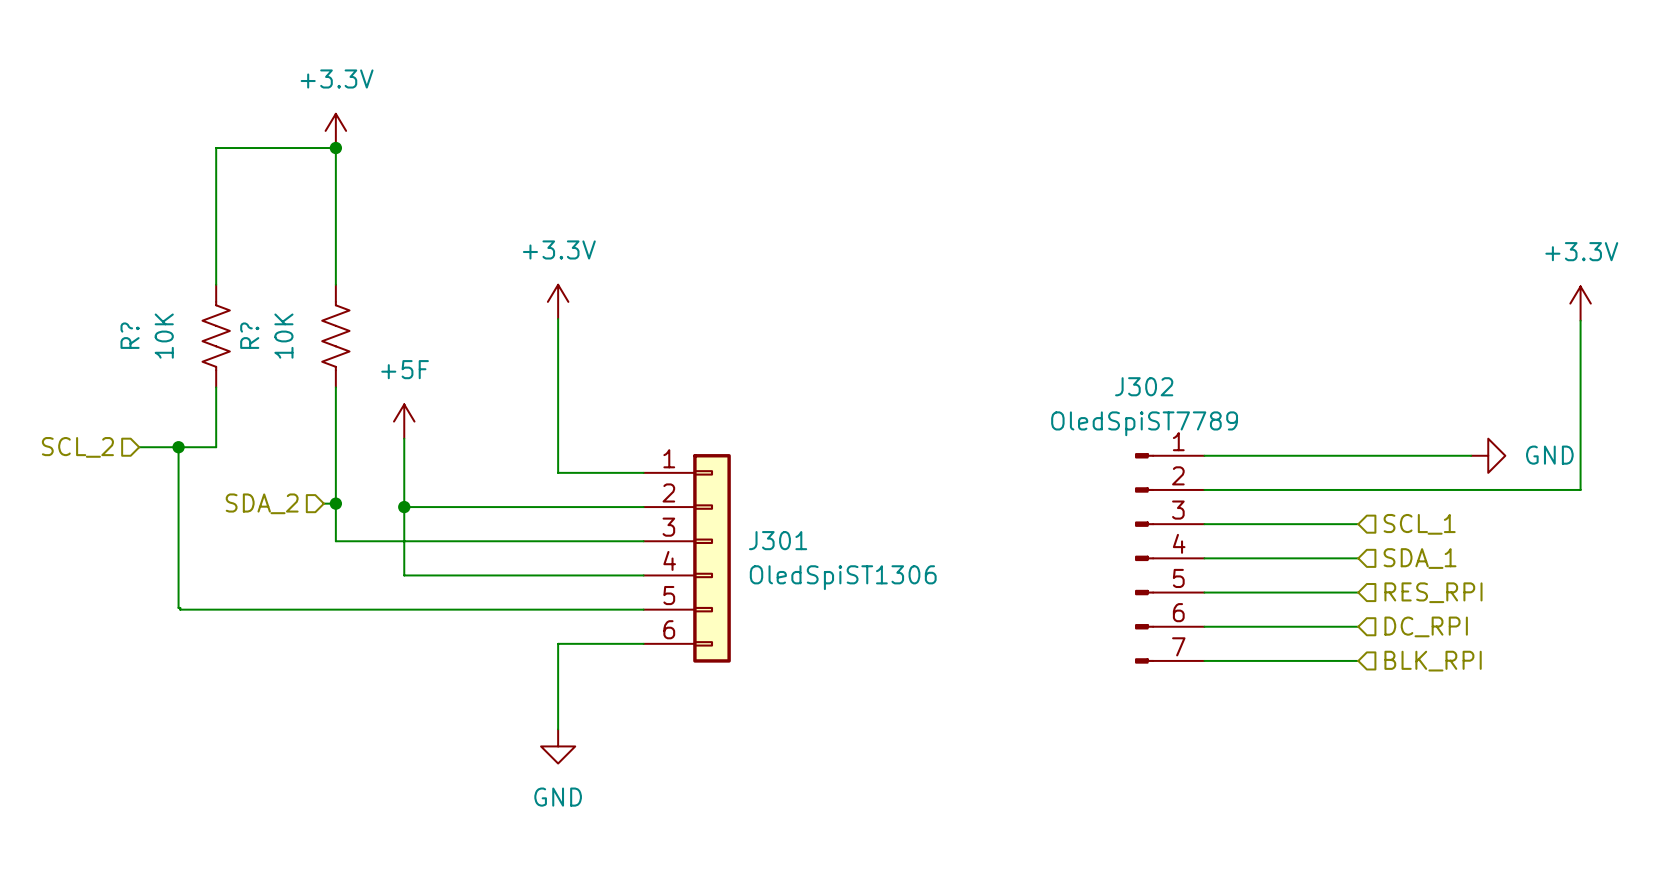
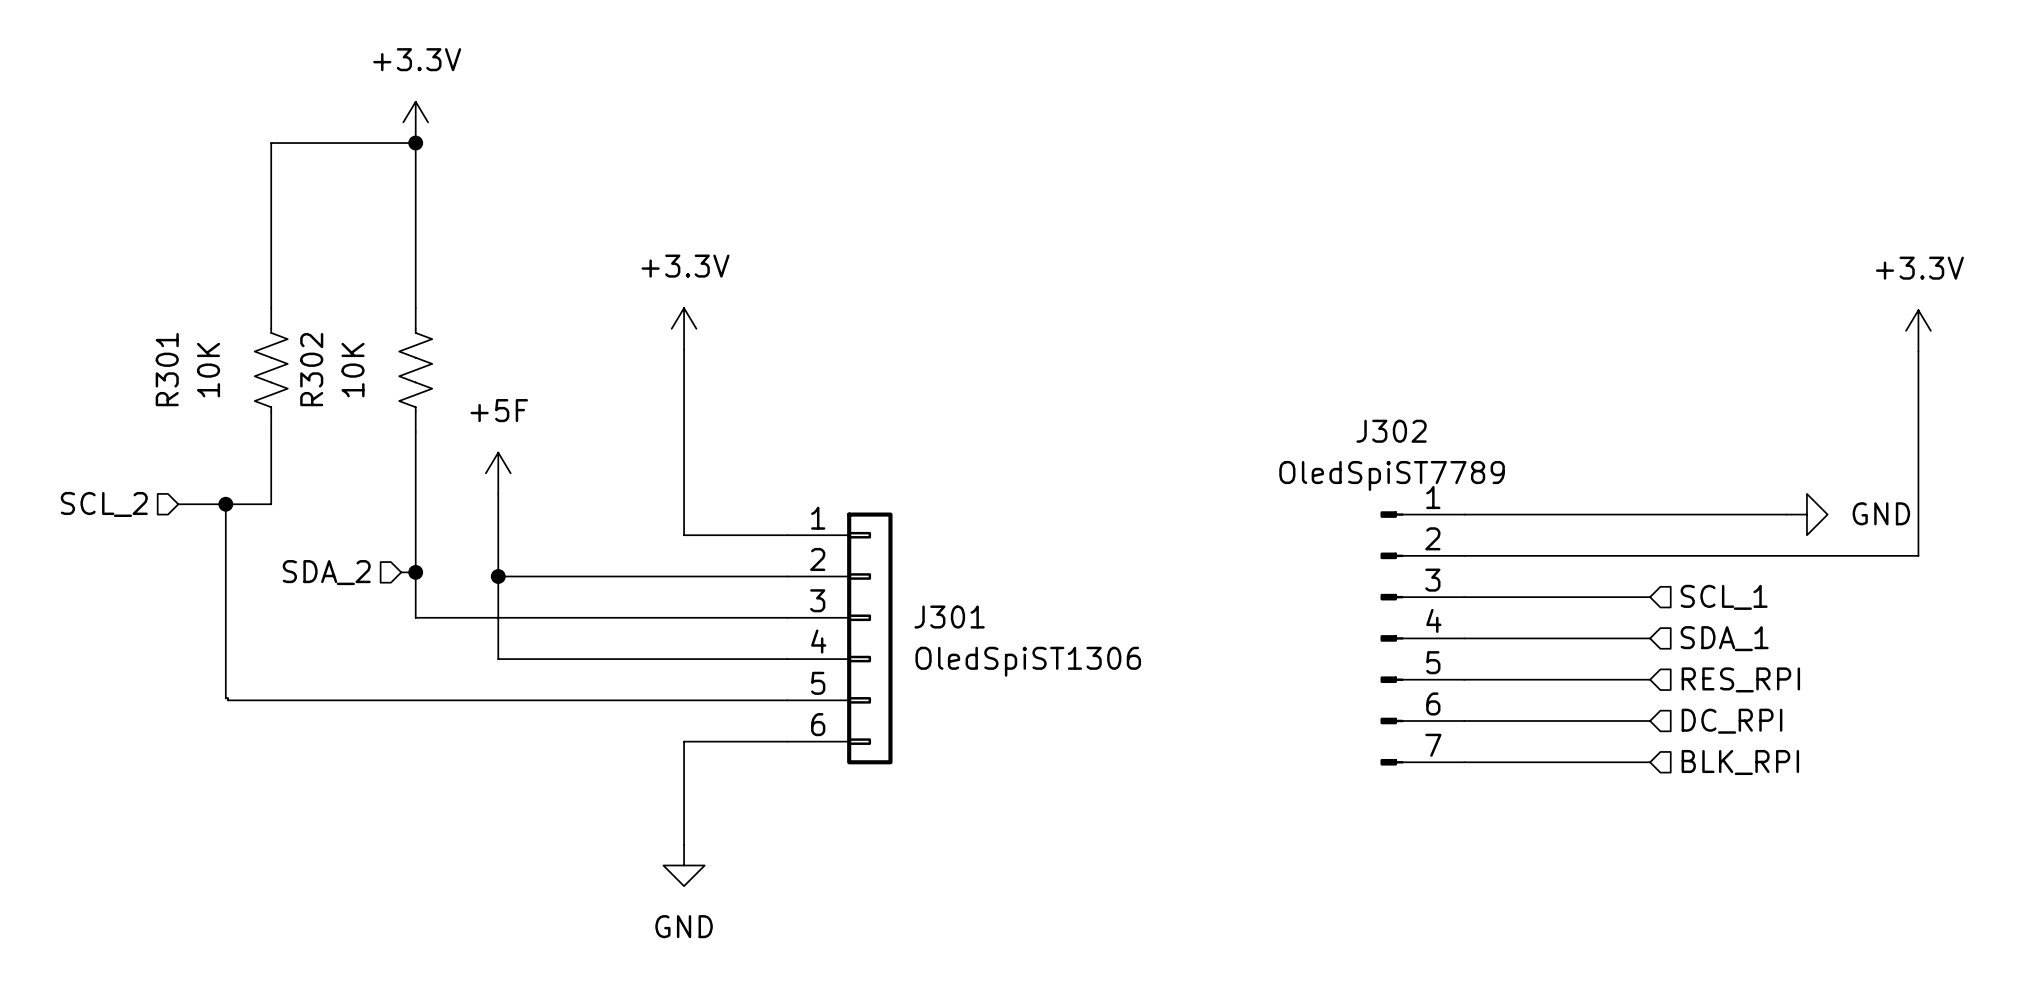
R? name: R? (130, 335) -> R301 (167, 369)
R? name: R? (249, 335) -> R302 (311, 369)

